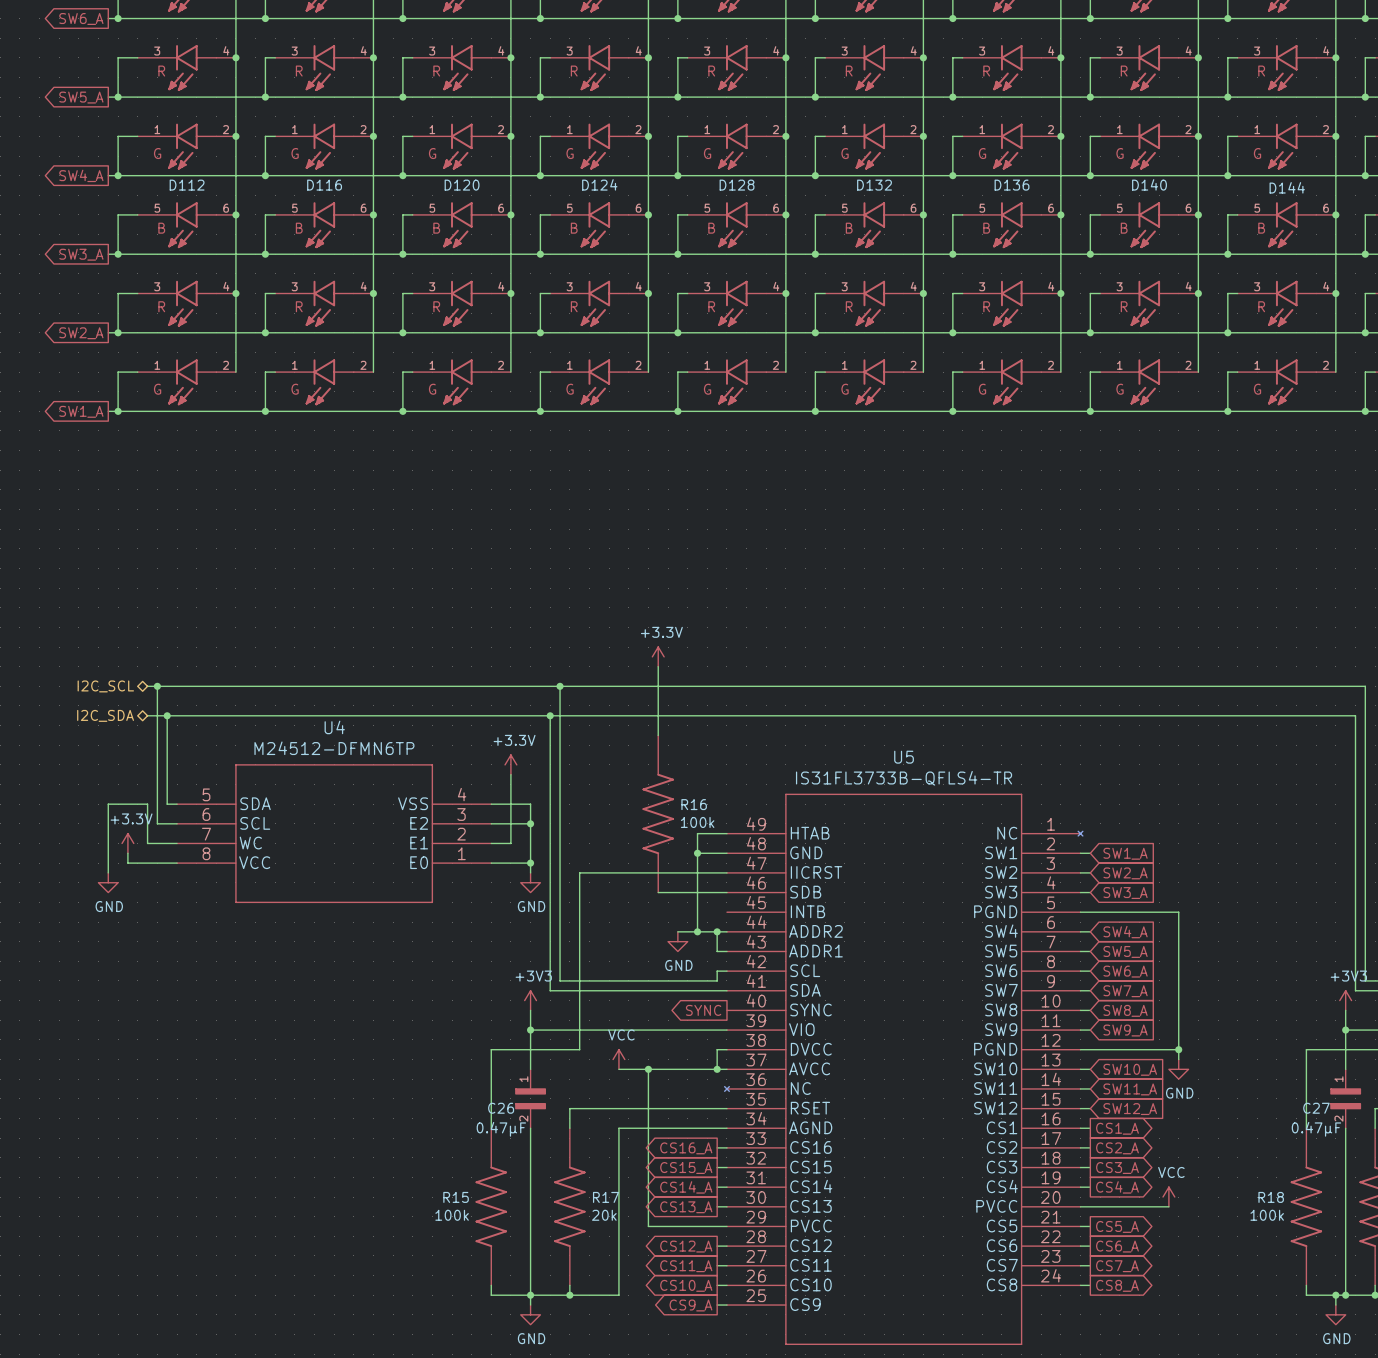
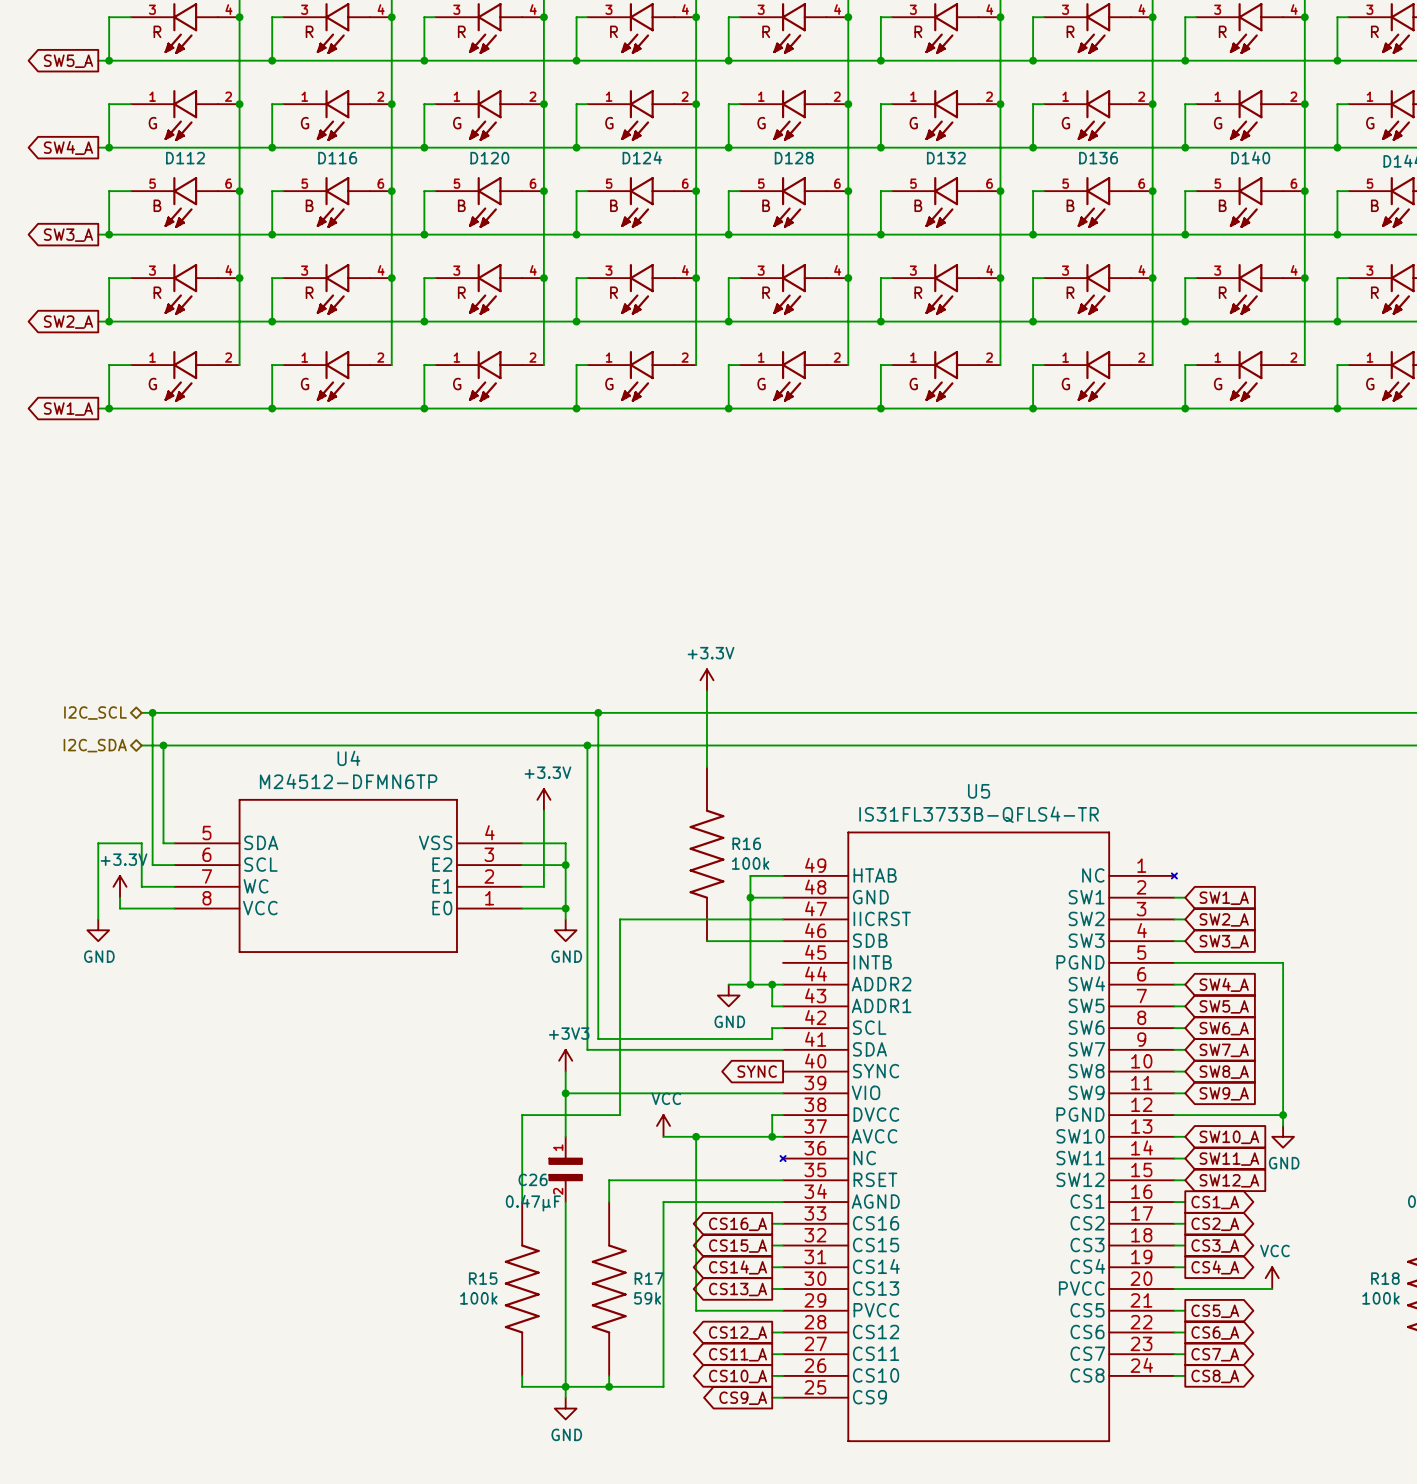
R17 text: 20k (604, 1215) -> 59k (647, 1298)

